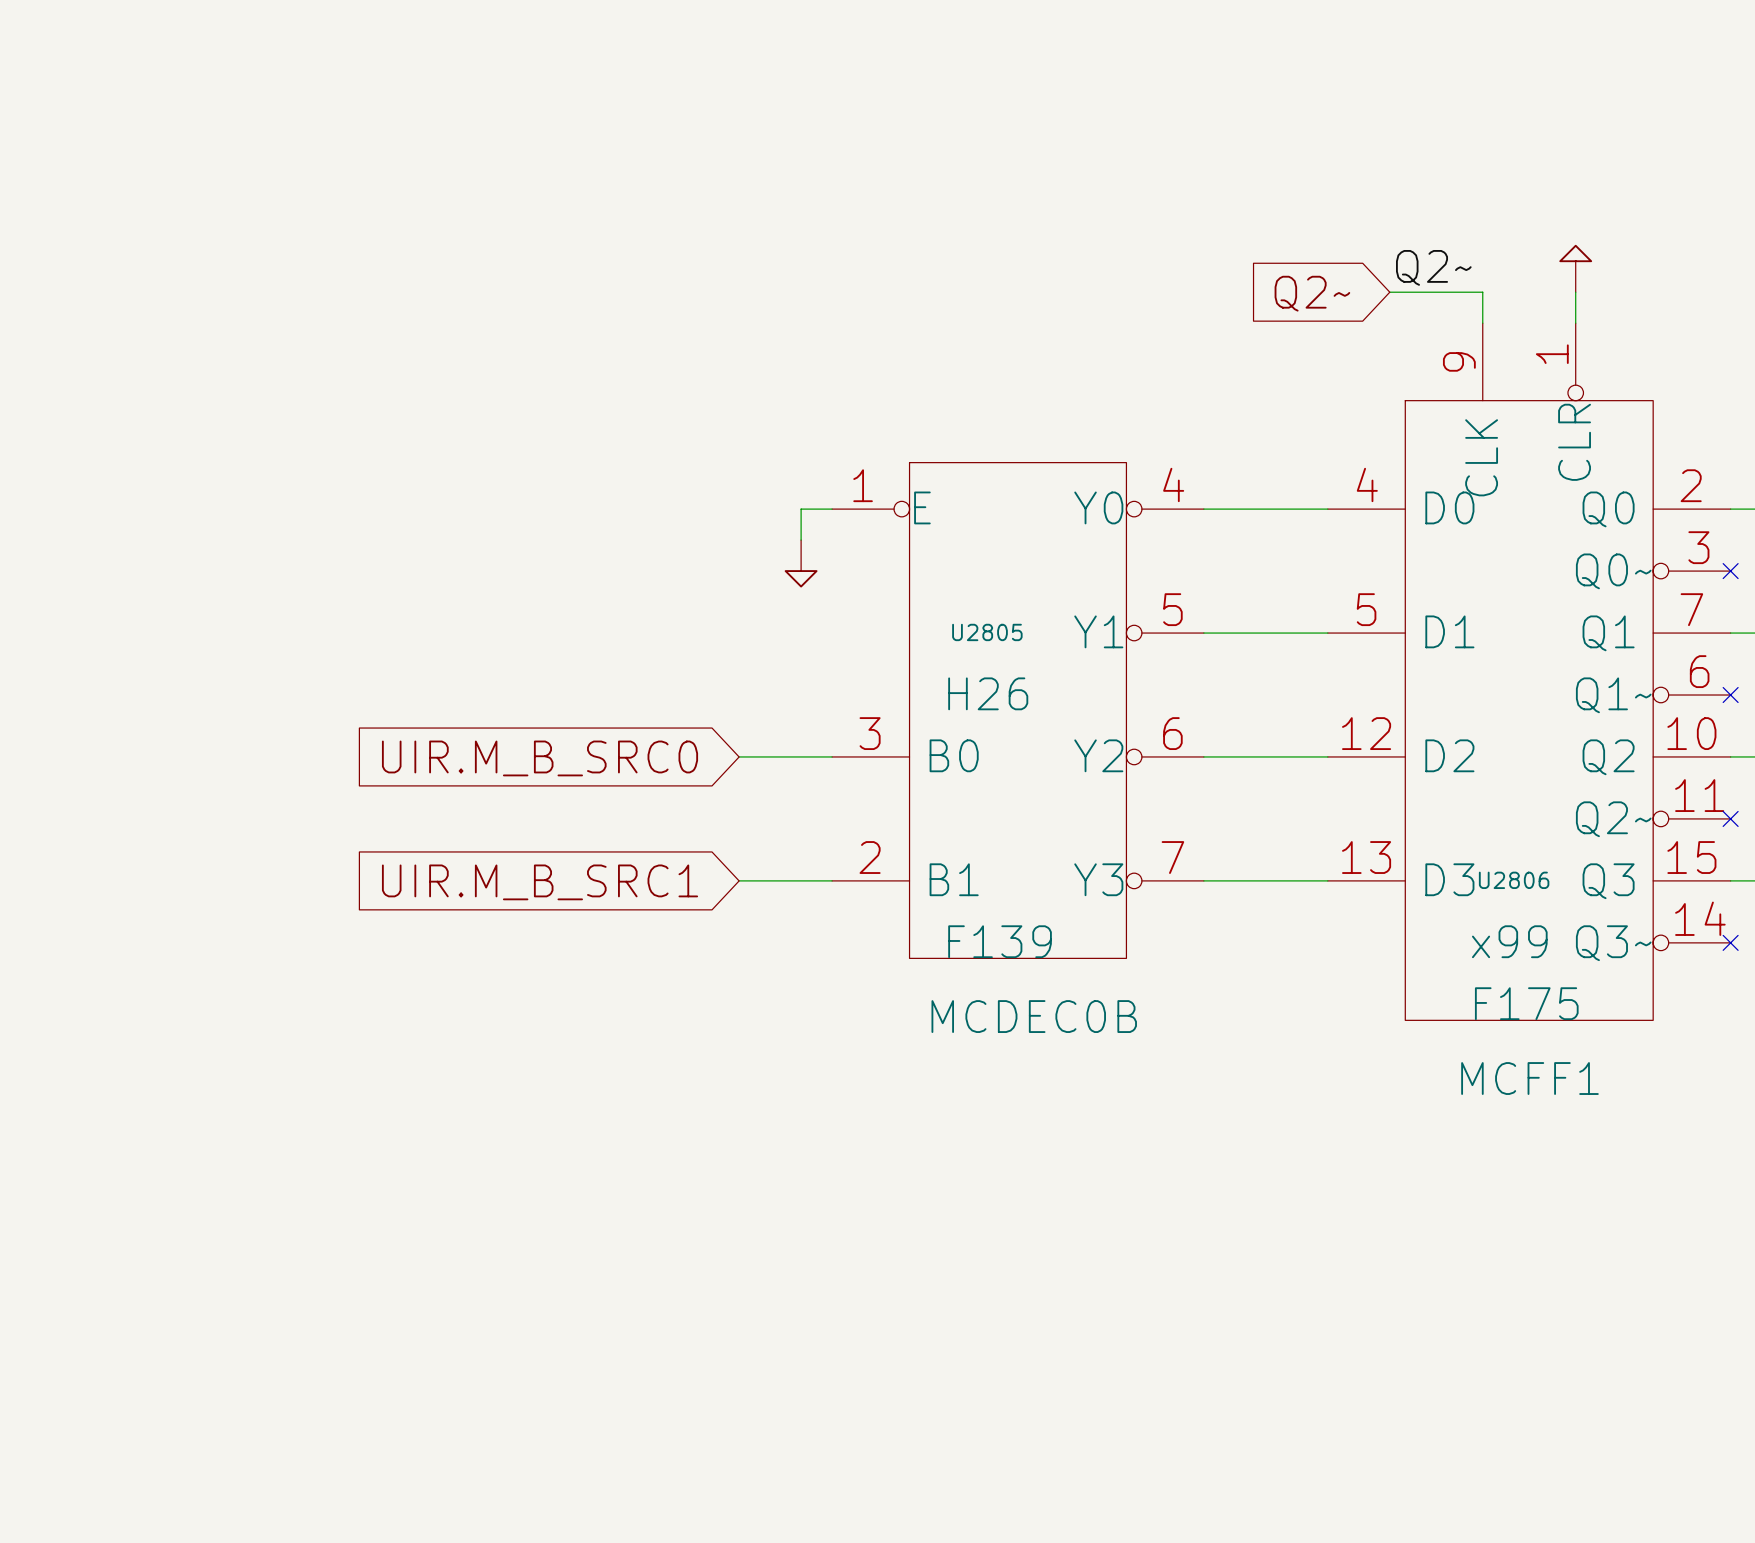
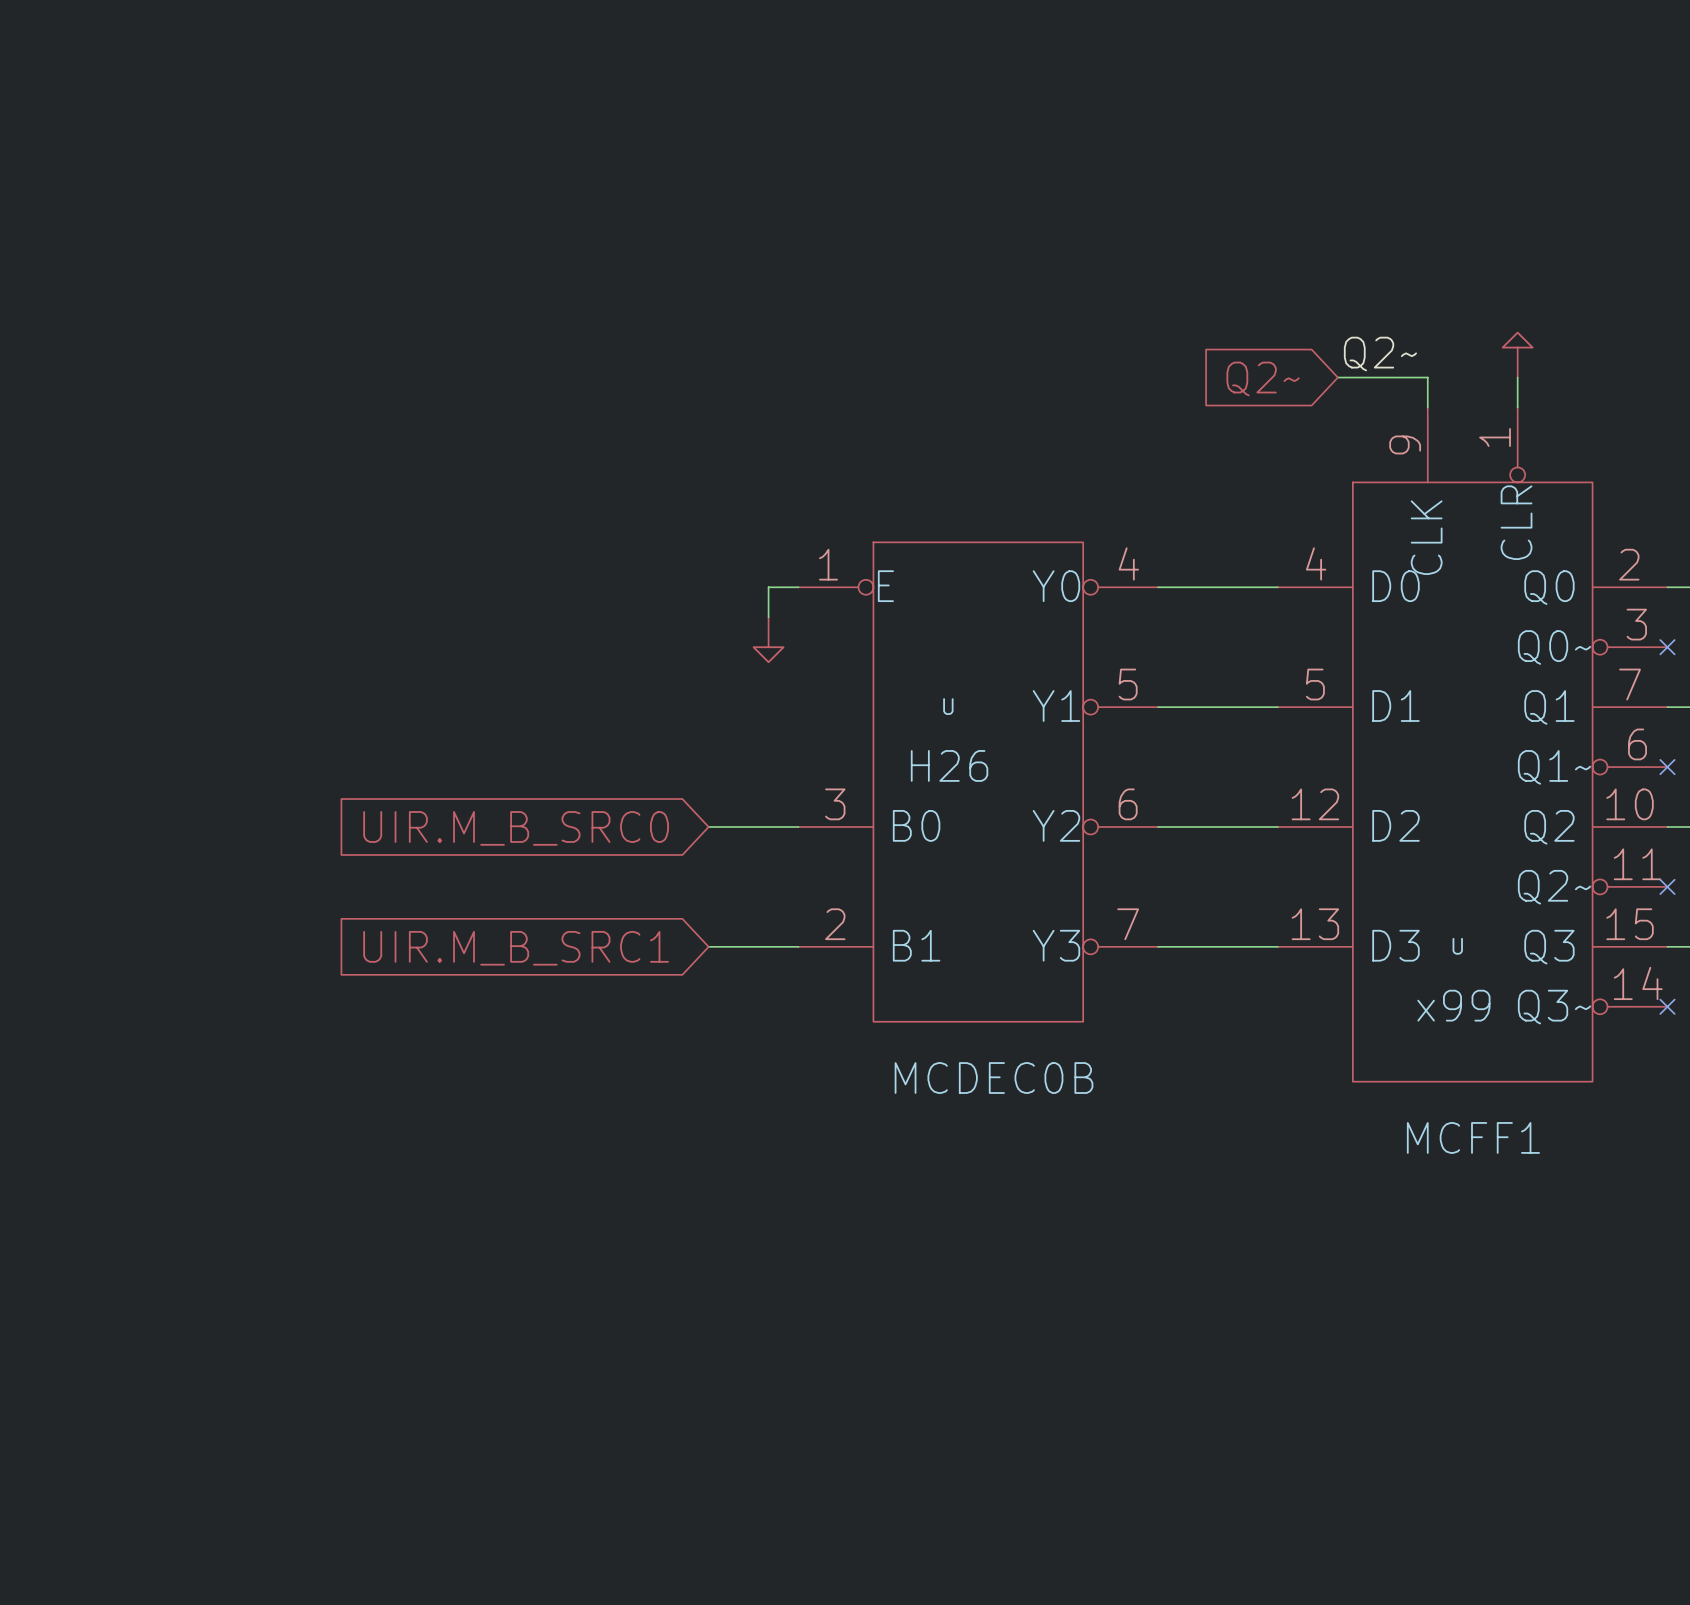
U2805 name: U2805 (987, 632) -> U (948, 706)
U2806 name: U2806 (1514, 880) -> U (1457, 946)
U2805 value: F139 (1000, 941) -> none
U2806 value: F175 (1526, 1003) -> none

